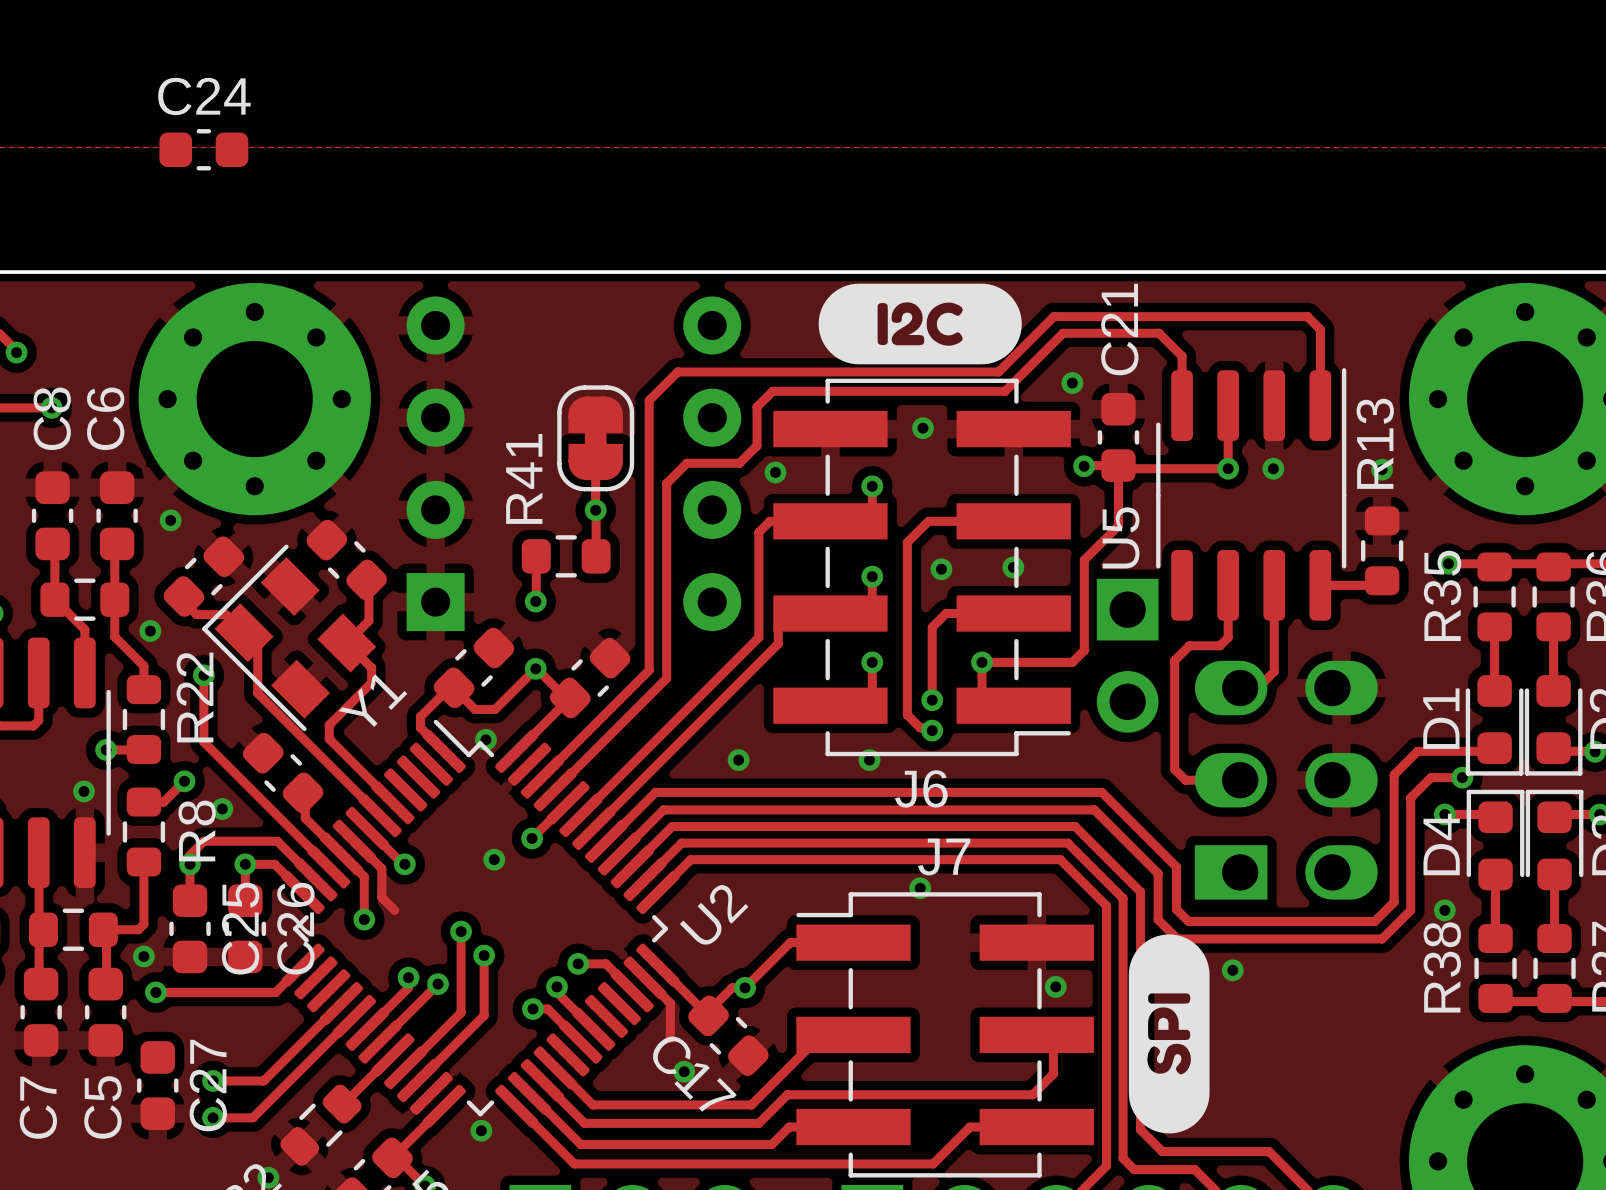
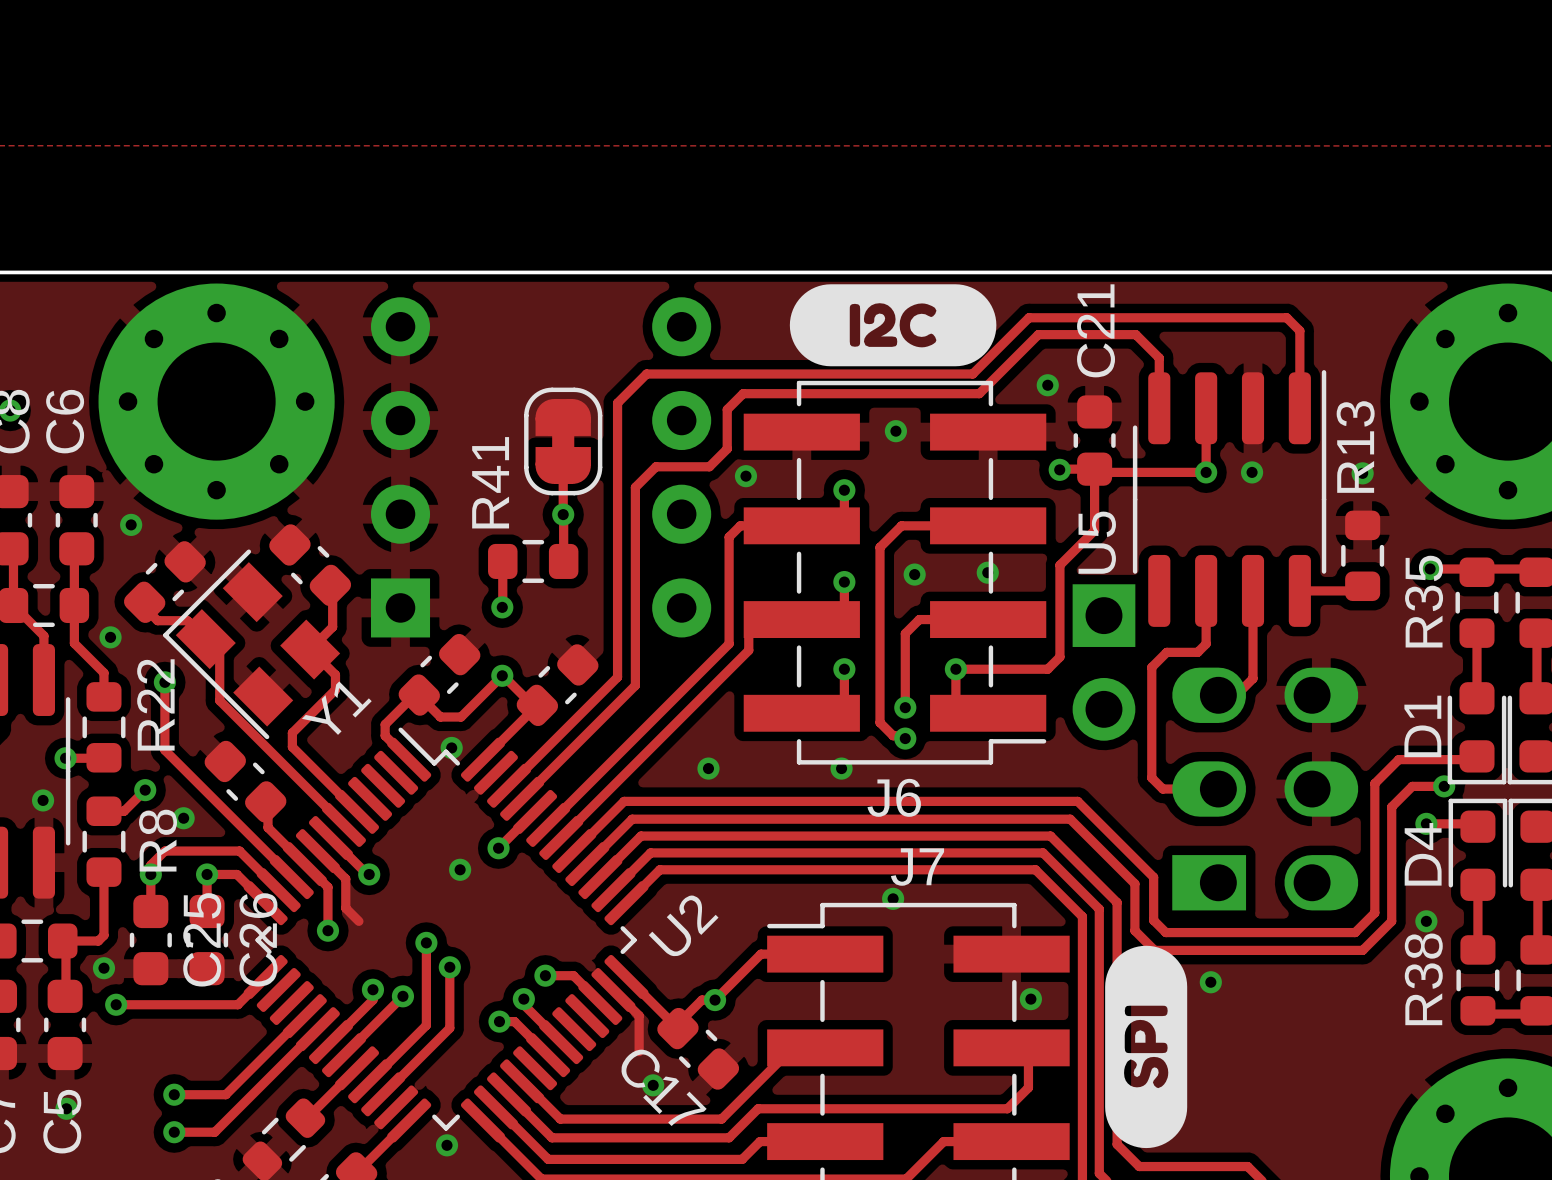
C24: (203, 149) -> none
C27: (157, 1085) -> none
via: none -> (66, 1108)

